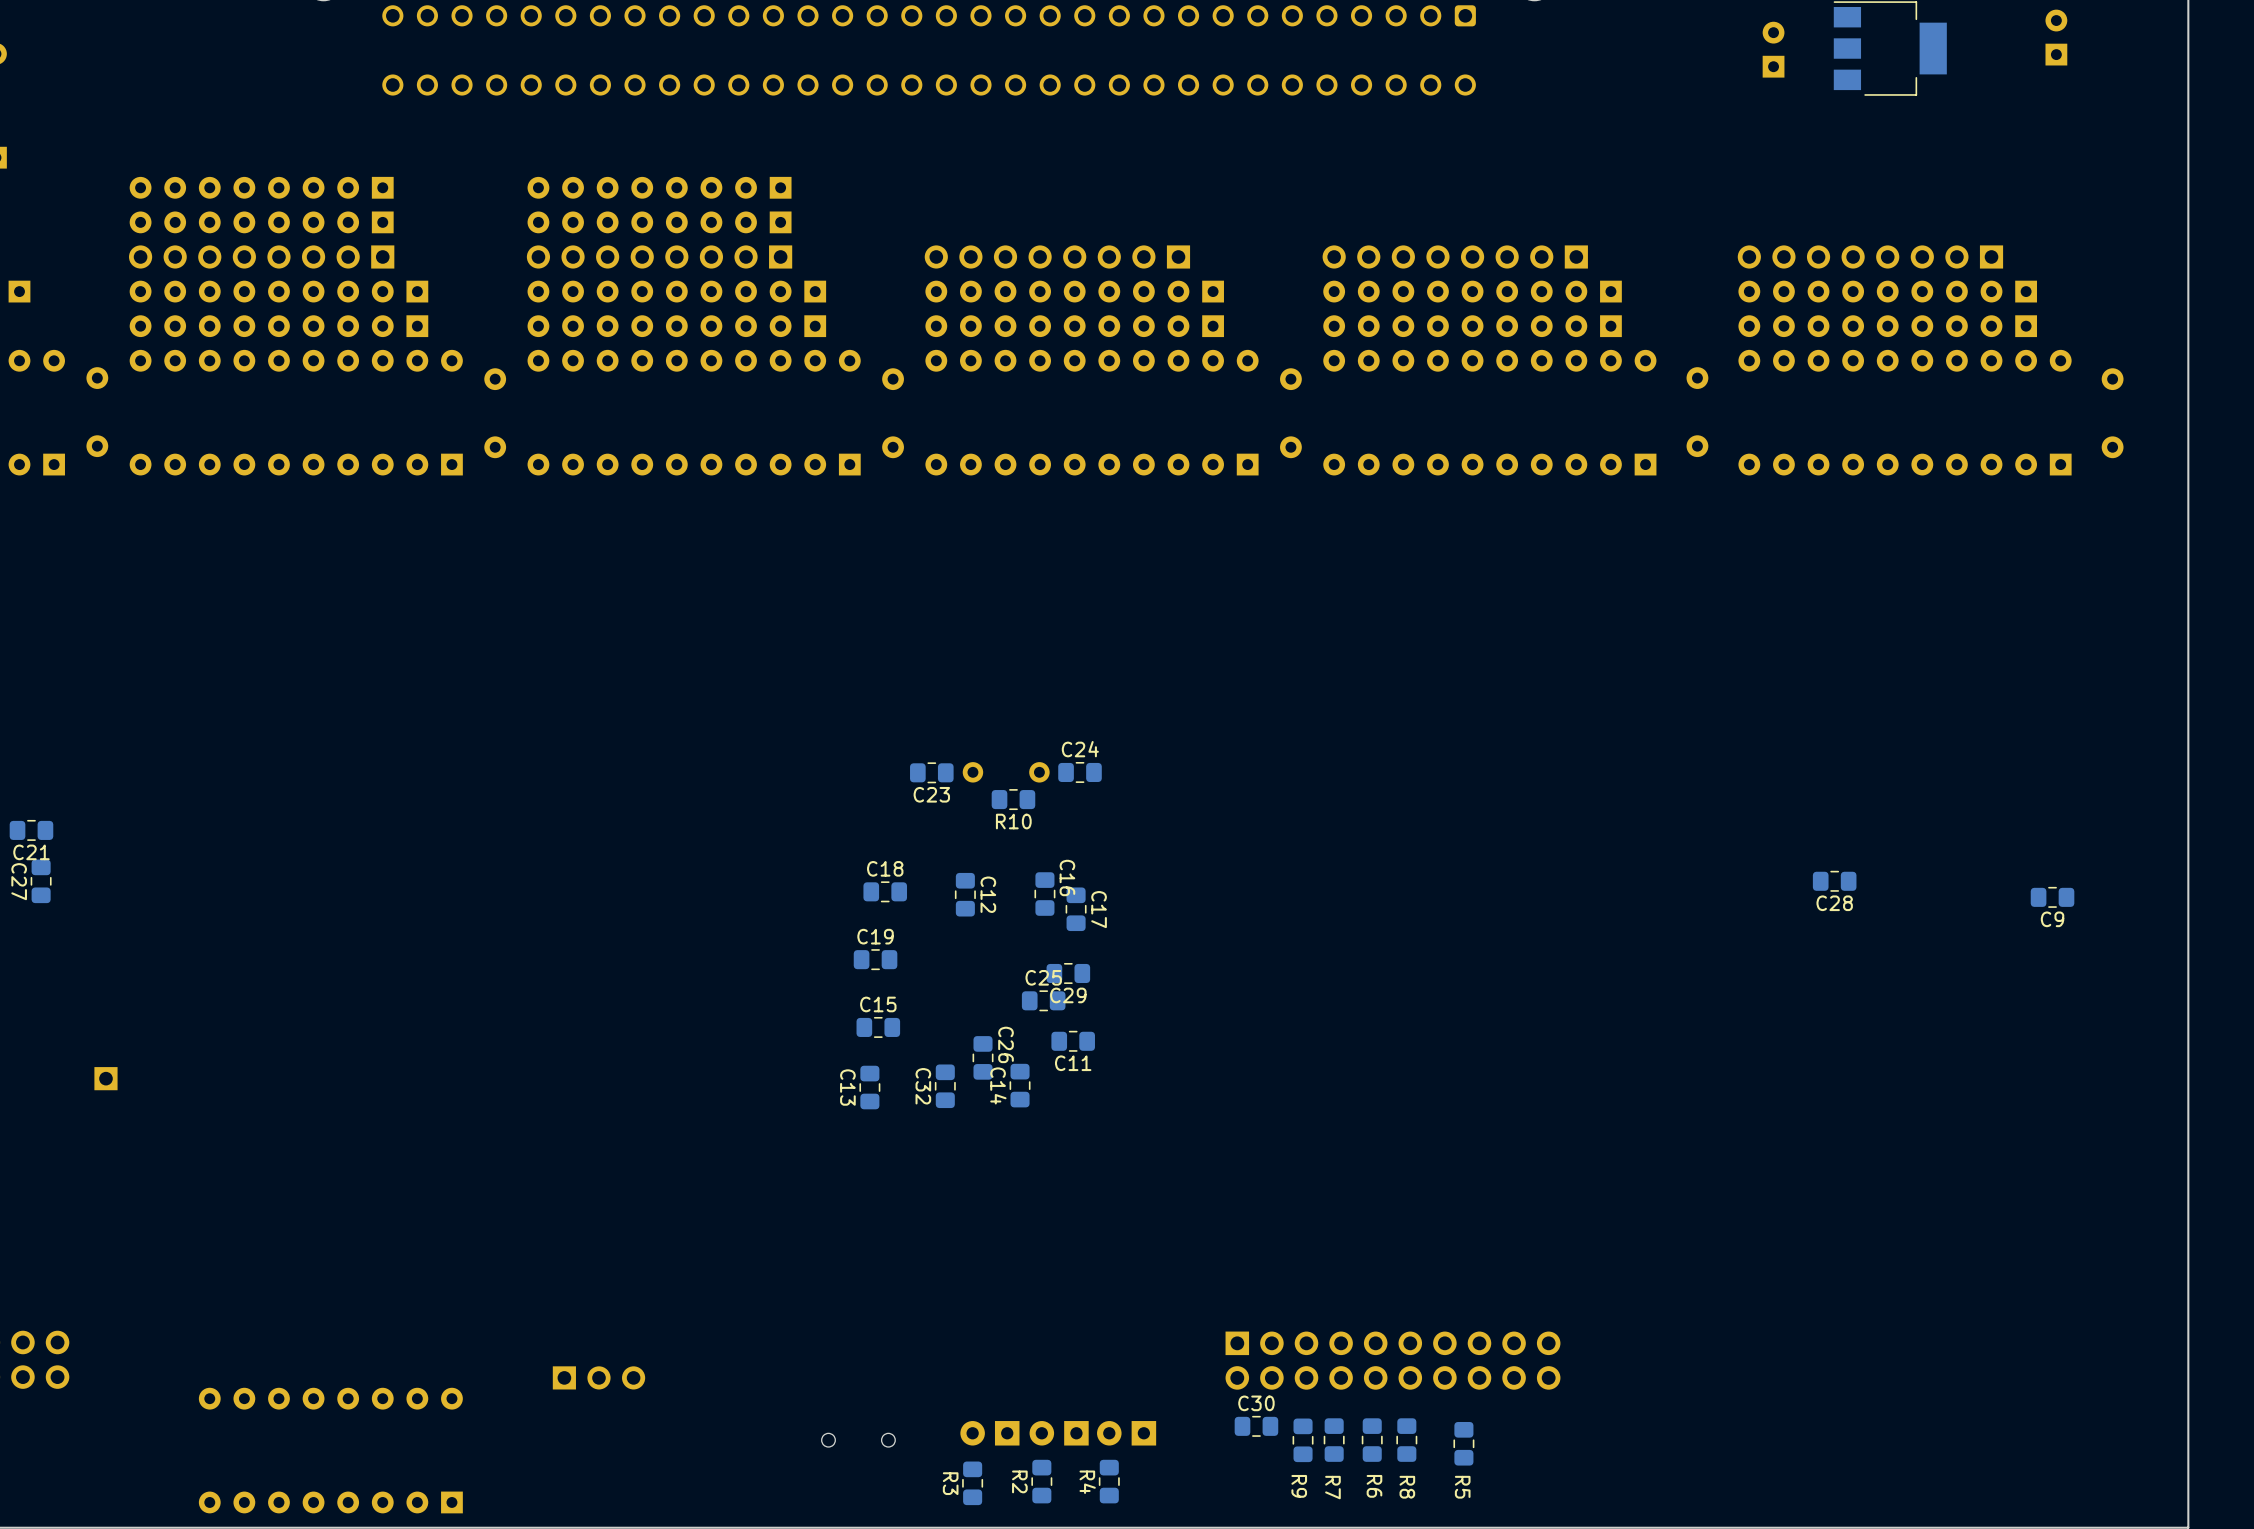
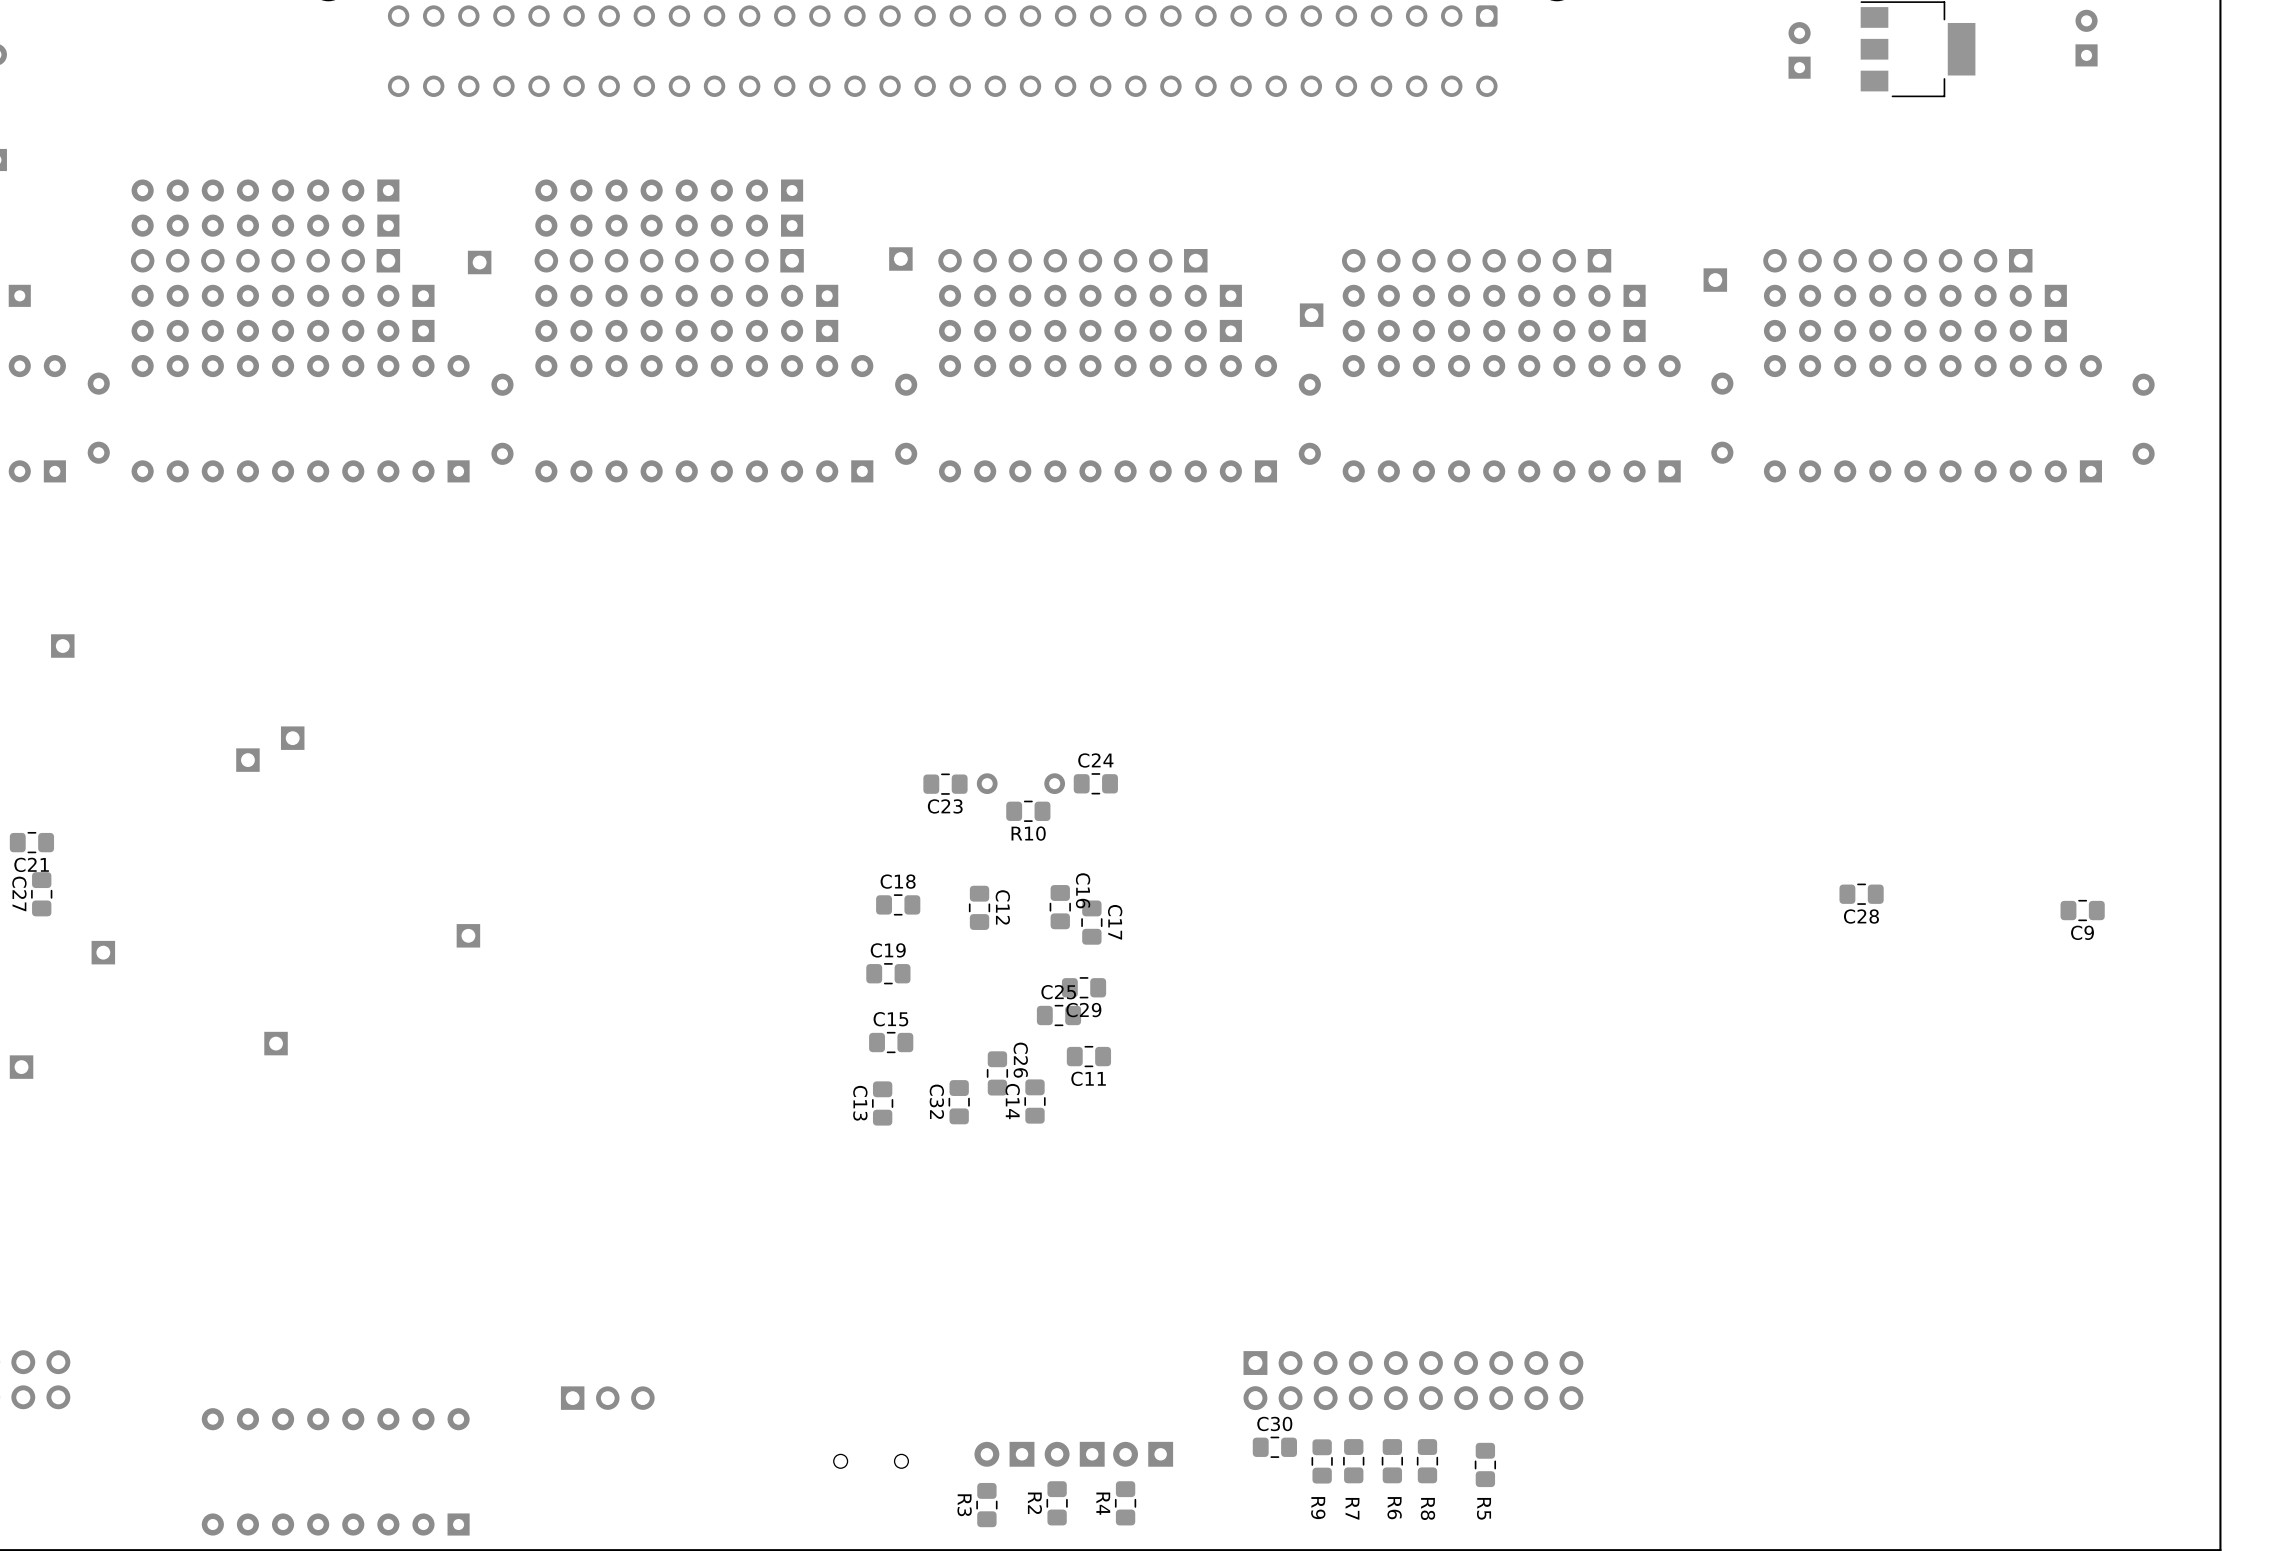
part: none -> (900, 258)
part: none -> (479, 262)
part: none -> (1715, 280)
part: none -> (1311, 315)
part: none -> (62, 646)
part: none -> (292, 738)
part: none -> (247, 760)
part: none -> (468, 935)
part: none -> (103, 952)
part: none -> (276, 1043)
part: none -> (21, 1067)
part: (105, 1078) -> none

